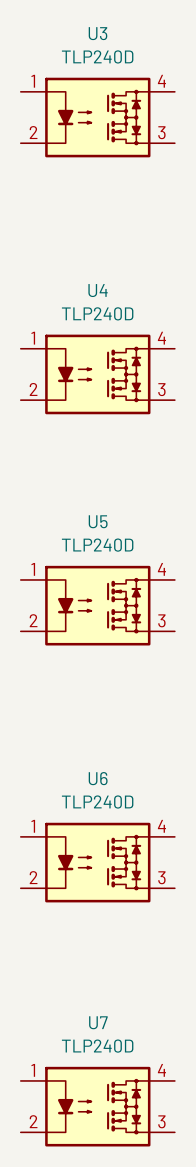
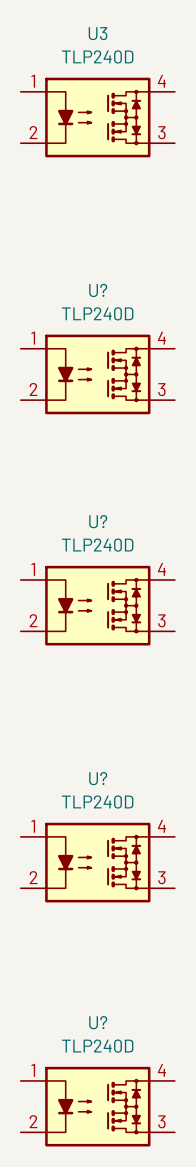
U4 name: U4 (98, 290) -> U? (98, 290)
U5 name: U5 (98, 521) -> U? (98, 521)
U6 name: U6 (98, 778) -> U? (98, 778)
U7 name: U7 (98, 1022) -> U? (98, 1022)

